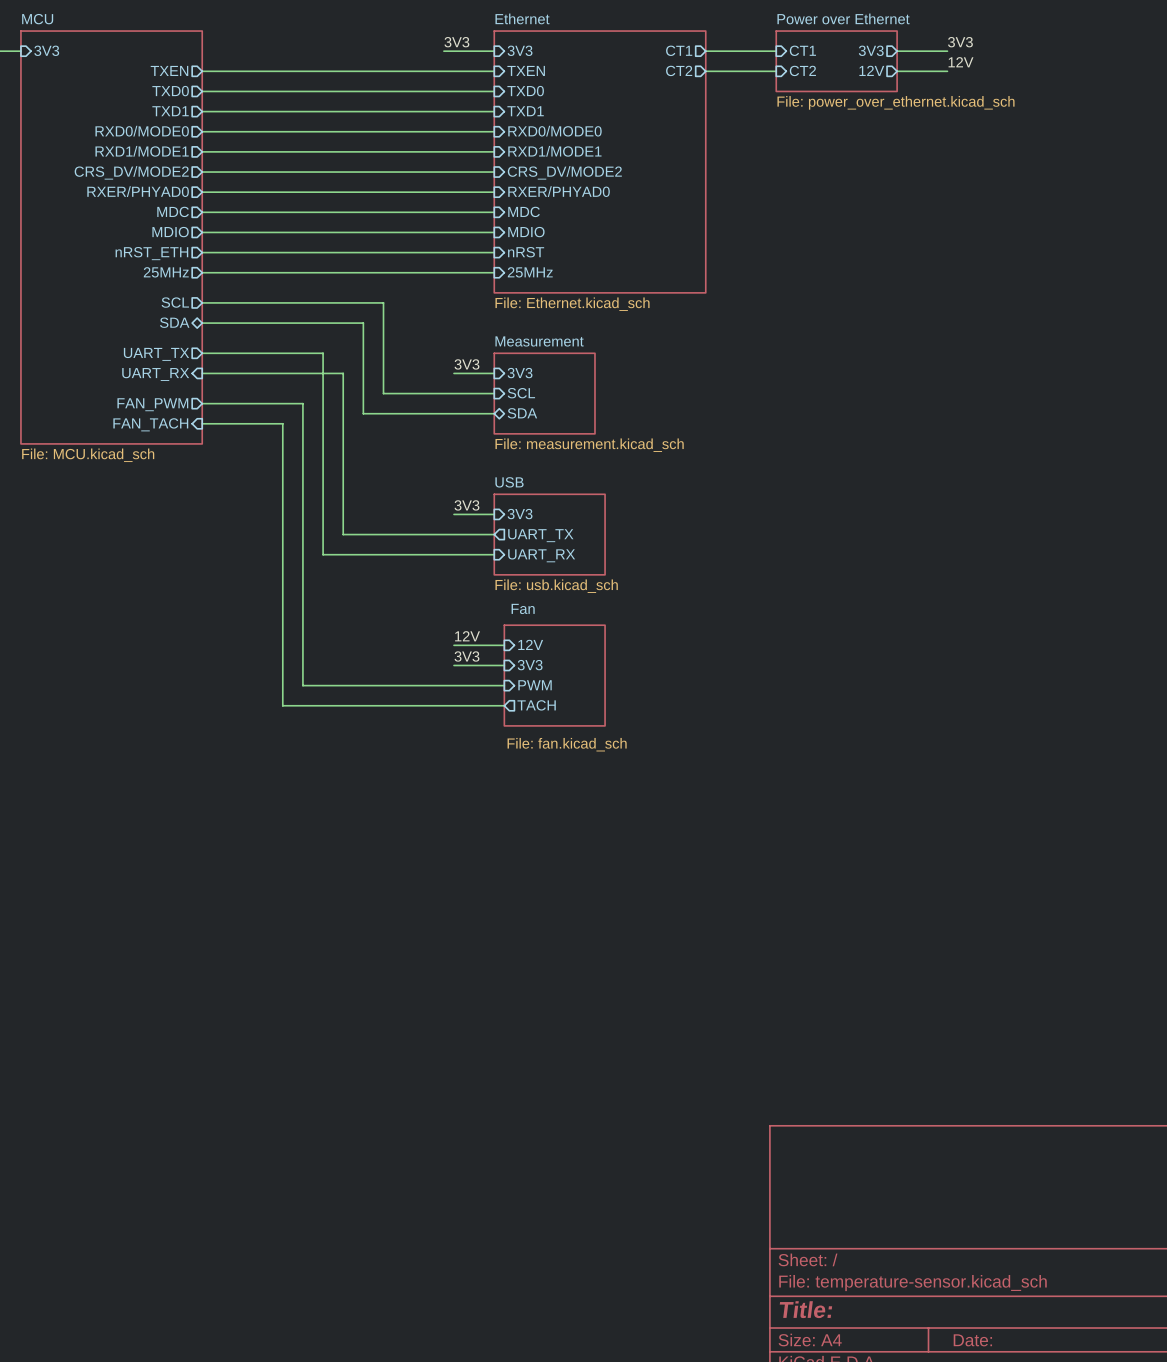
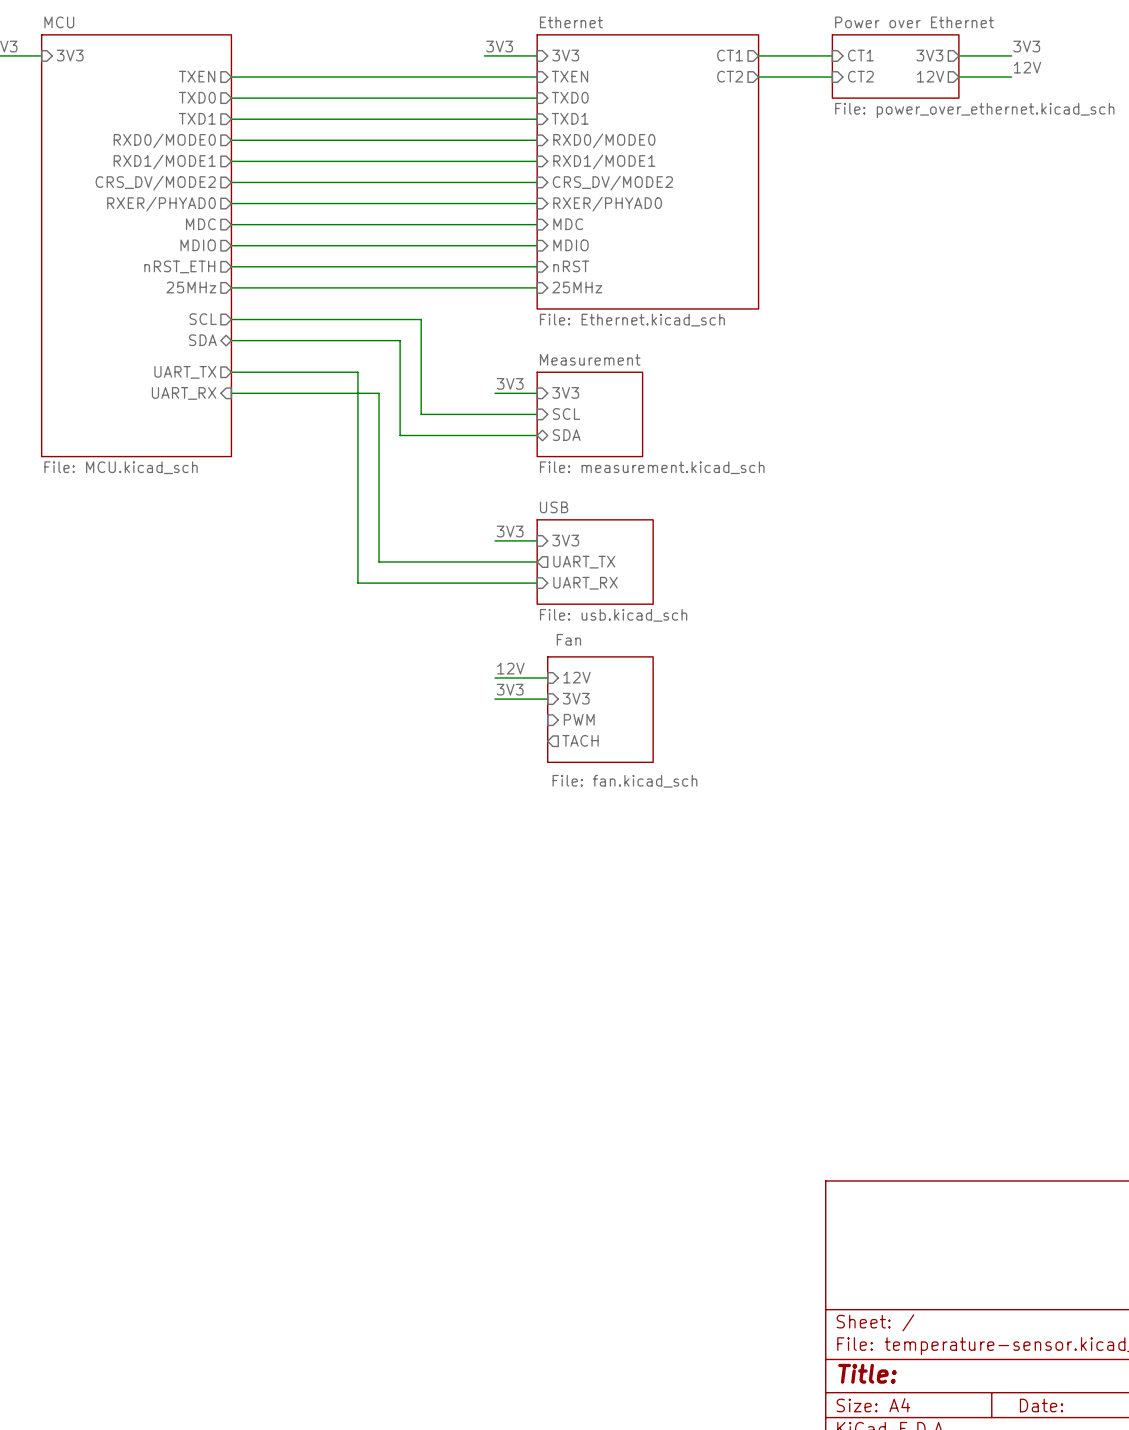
sheet MCU shape: [20, 30, 203, 445] -> [41, 34, 233, 458]
wire: (202, 403) (302, 403) (302, 685) (504, 685) -> none
sheet pin: FAN_PWM (152, 404) -> none
wire: (202, 423) (282, 423) (282, 705) (504, 705) -> none
sheet pin: FAN_TACH (150, 424) -> none

